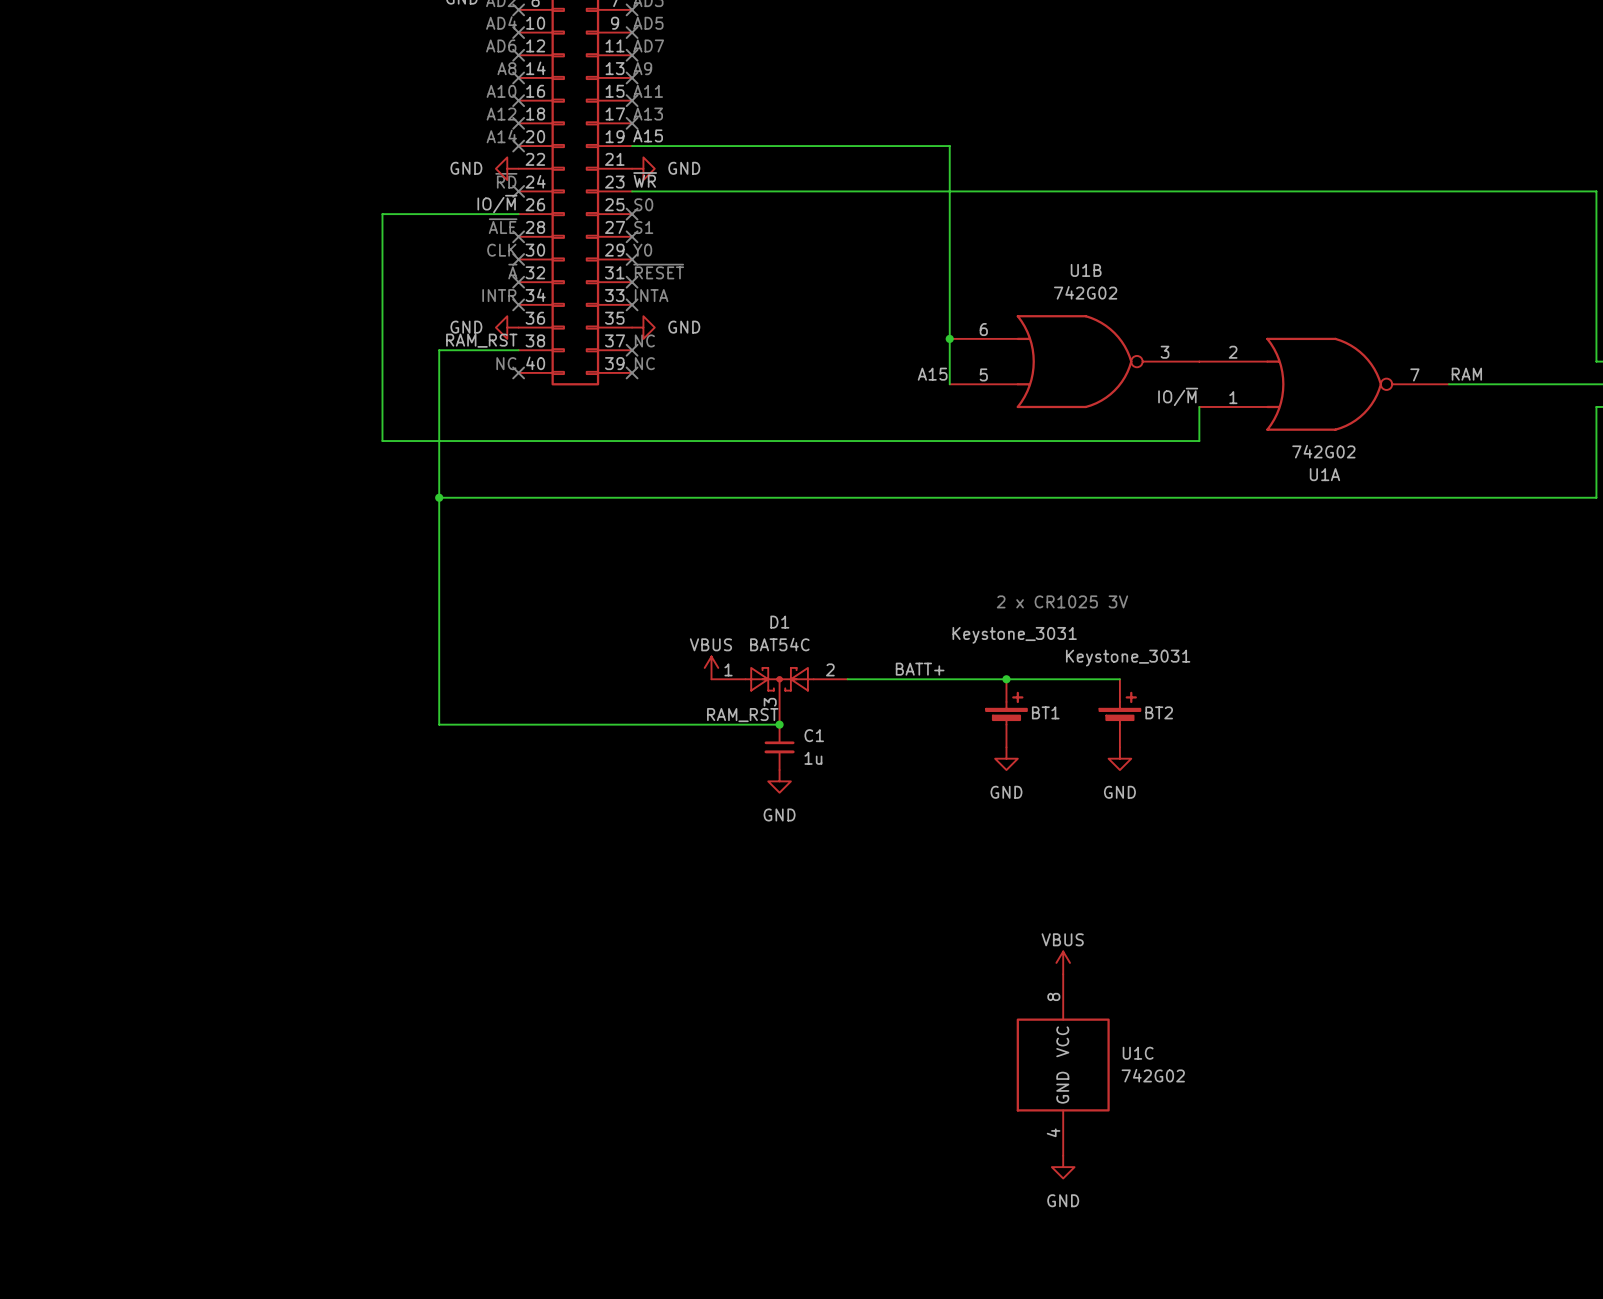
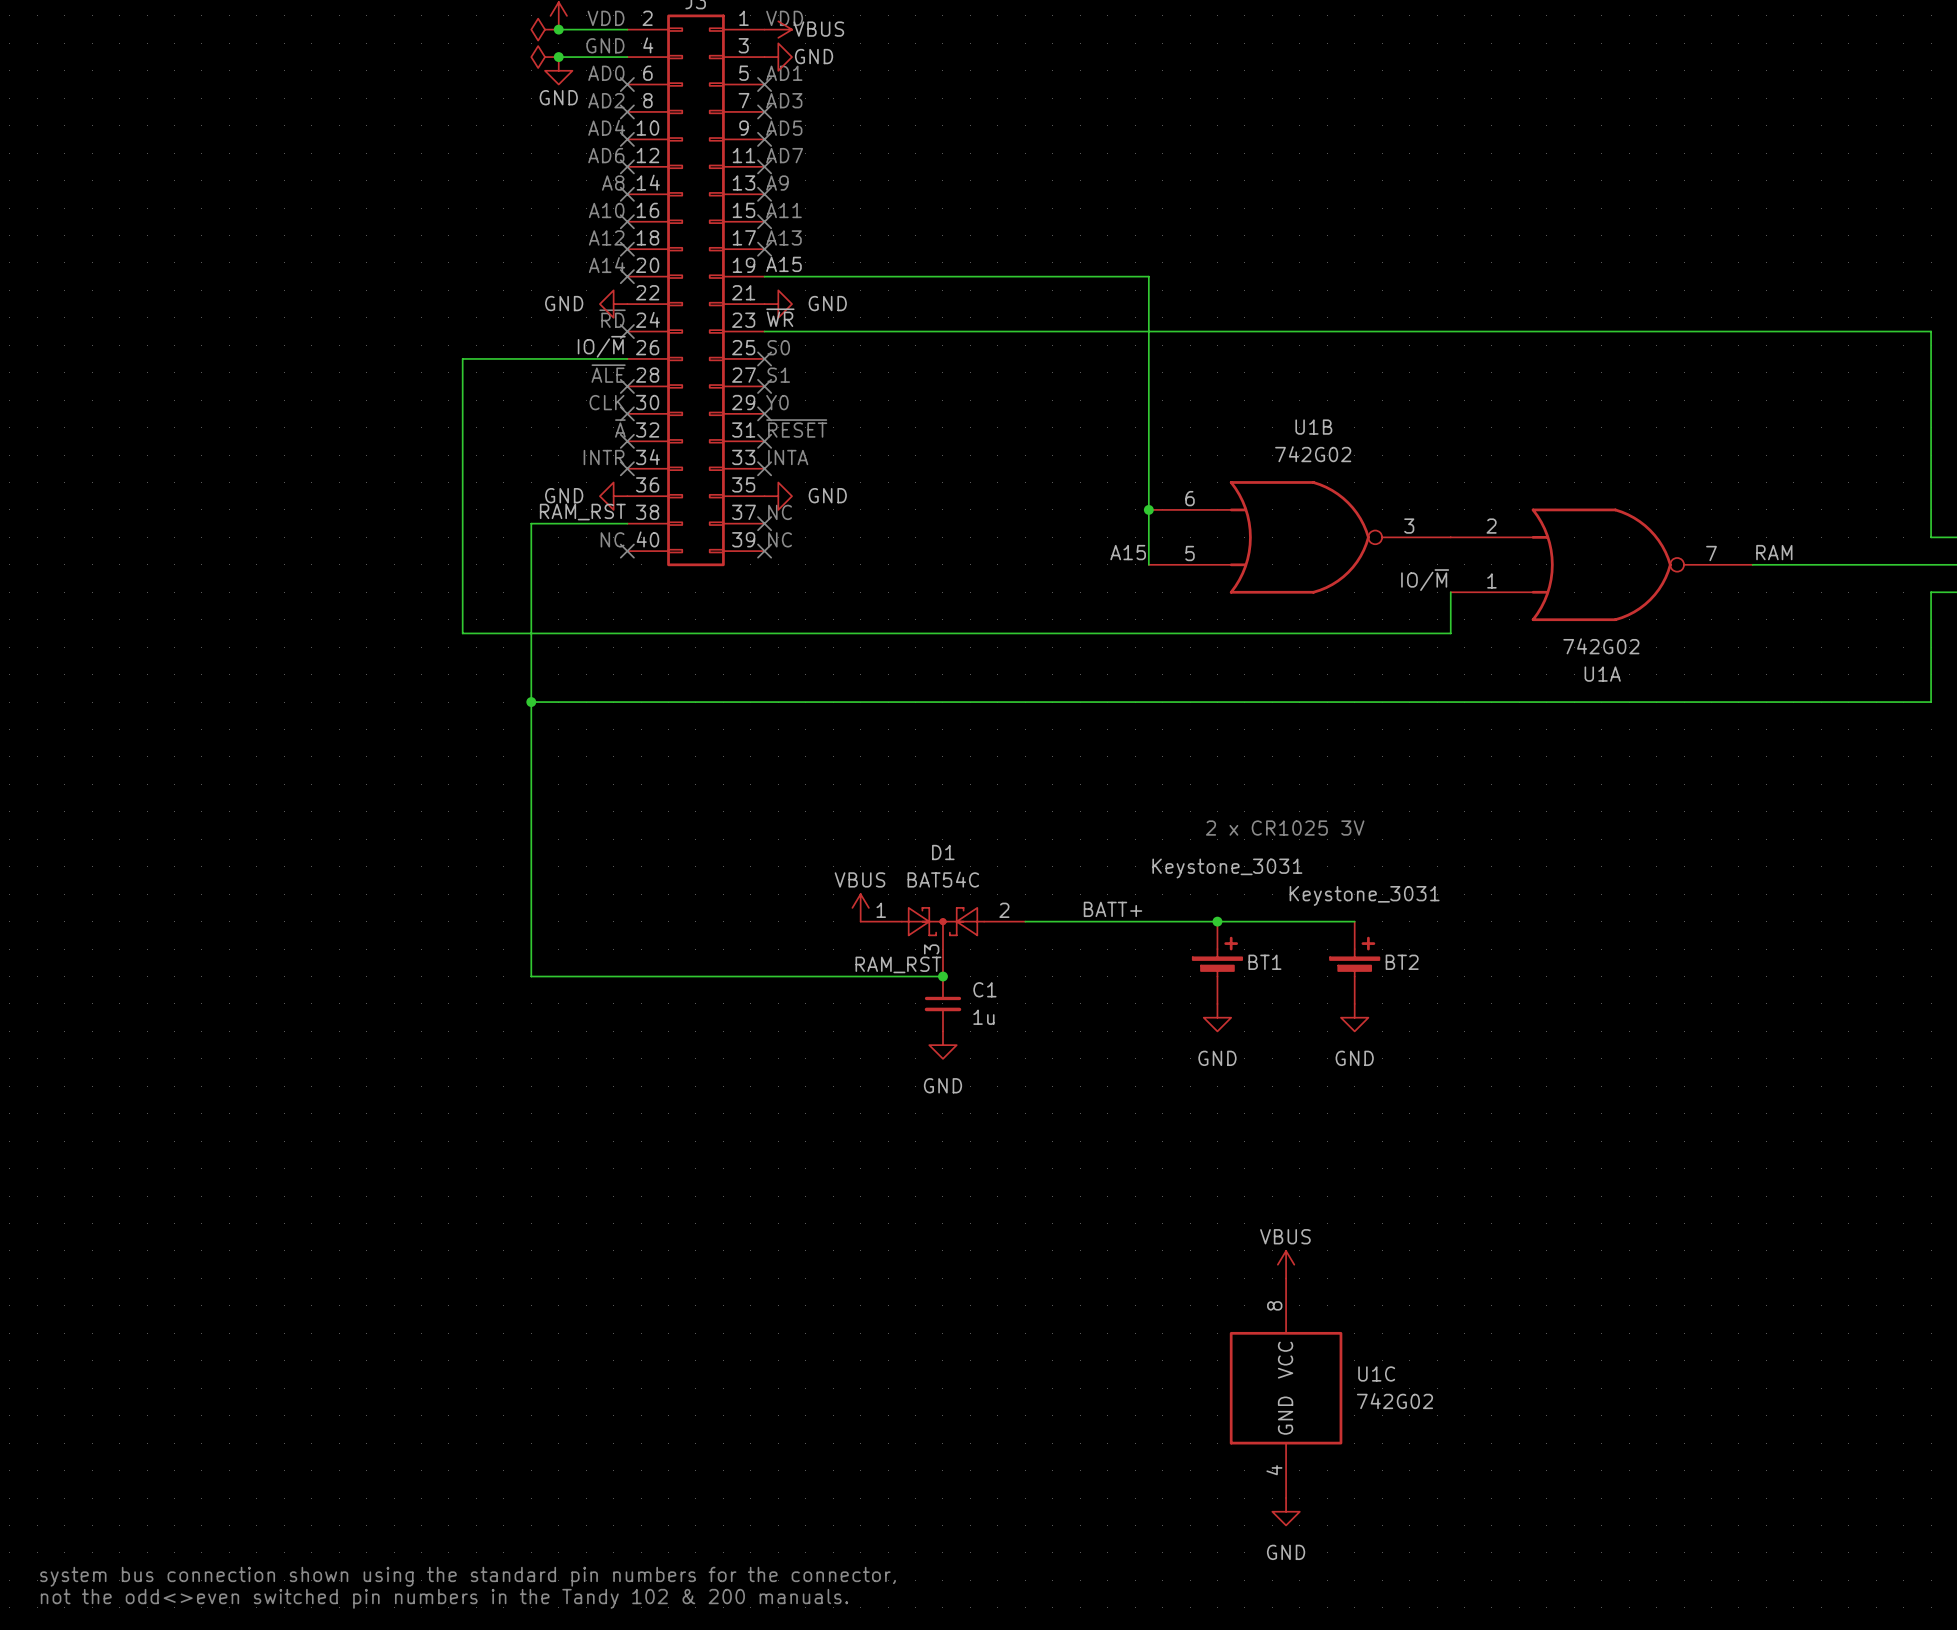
text: none -> system bus connection shown using the standard pin numbers for the connector, (468, 1576)
text: none -> not the odd<>even switched pin numbers in the Tandy 102 & 200 manuals. (444, 1598)

